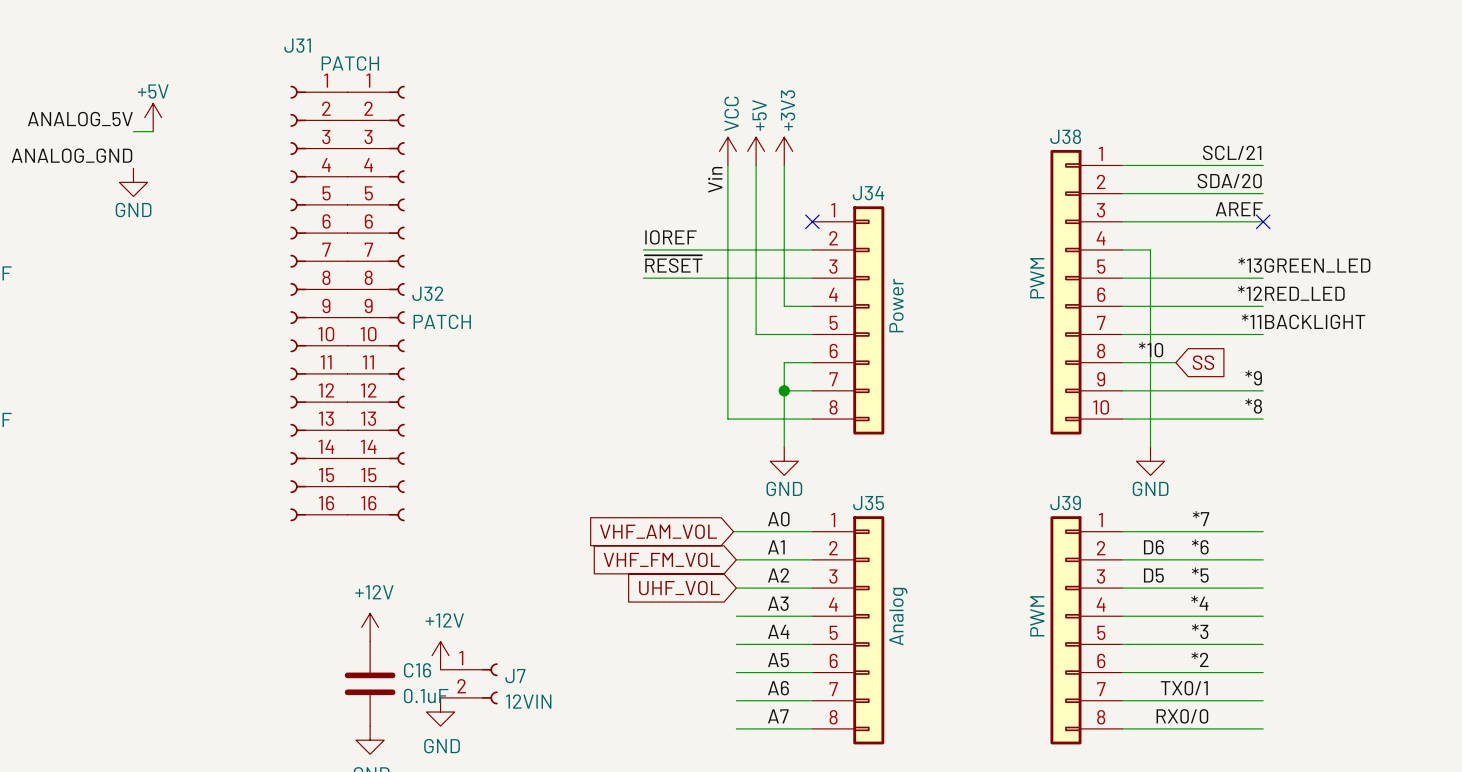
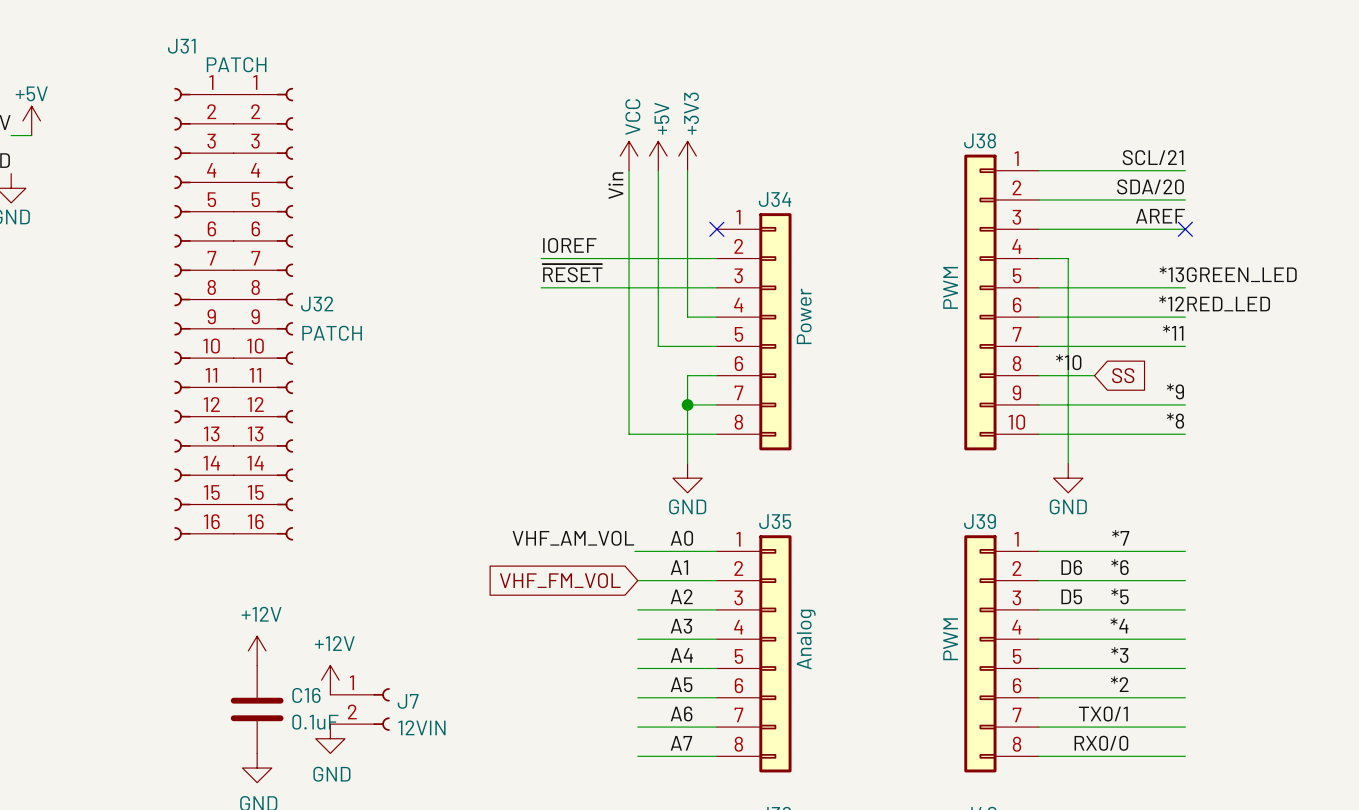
label: BACKLIGHT (1315, 321) -> none
label: none -> VHF_AM_VOL (573, 538)
global label: VHF_AM_VOL (658, 531) -> none
global label: UHF_VOL (679, 588) -> none

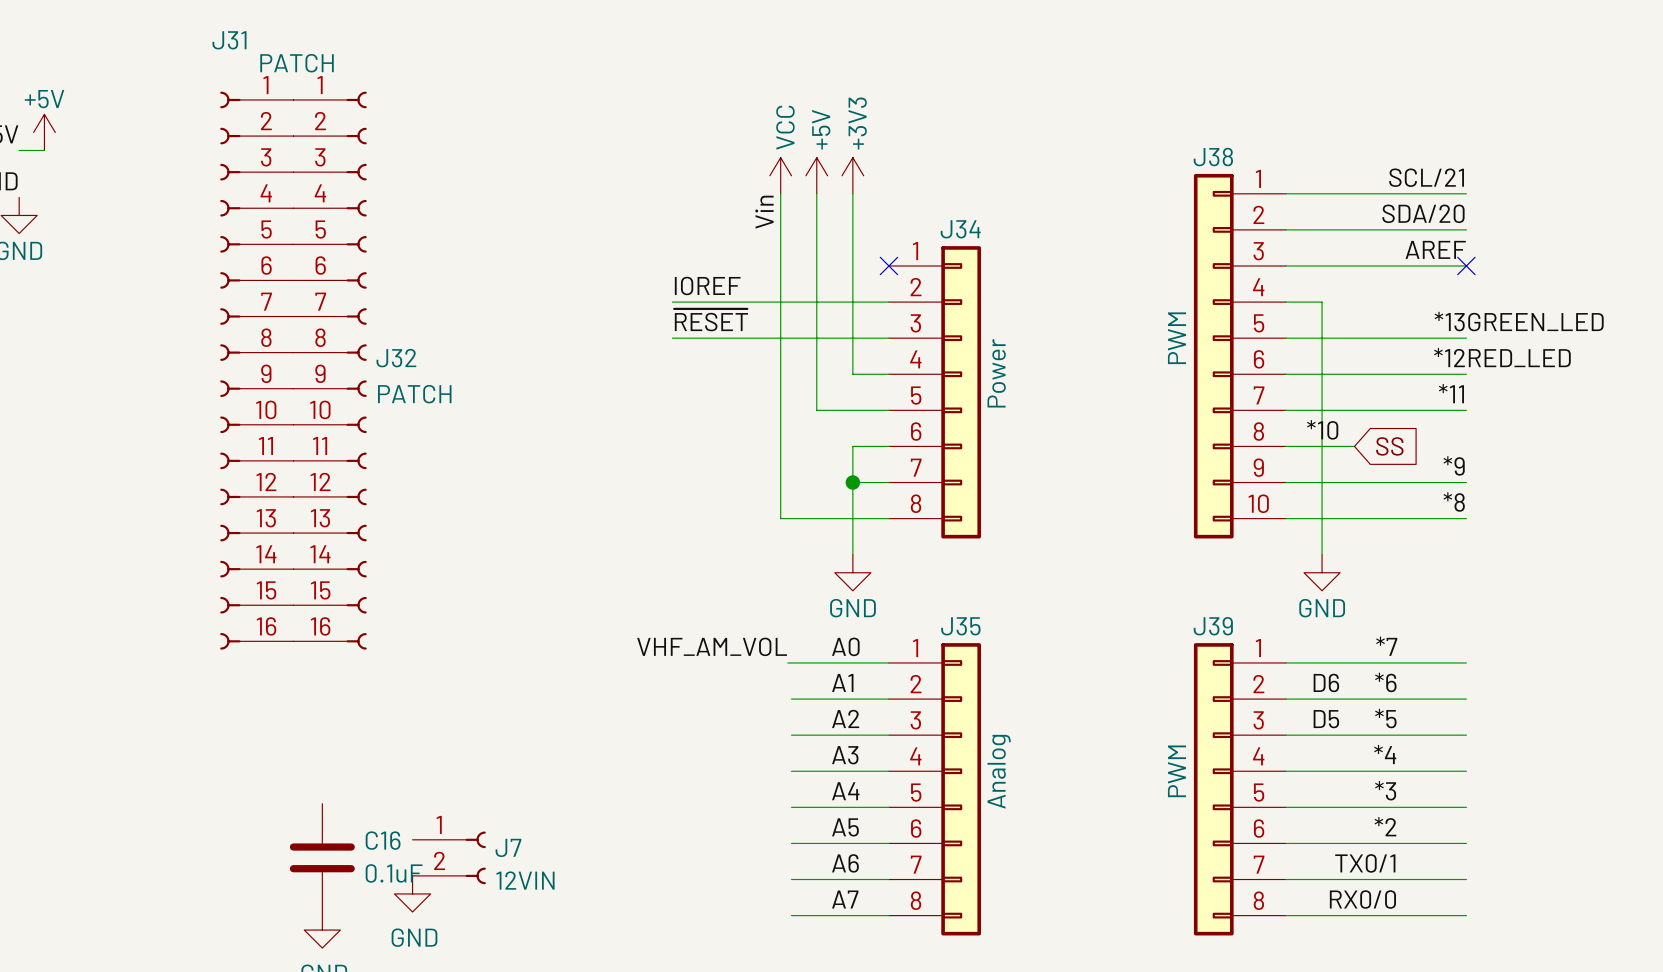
global label: VHF_FM_VOL (560, 580) -> none
power symbol: +12V (257, 650) -> none
power symbol: +12V (330, 680) -> none

